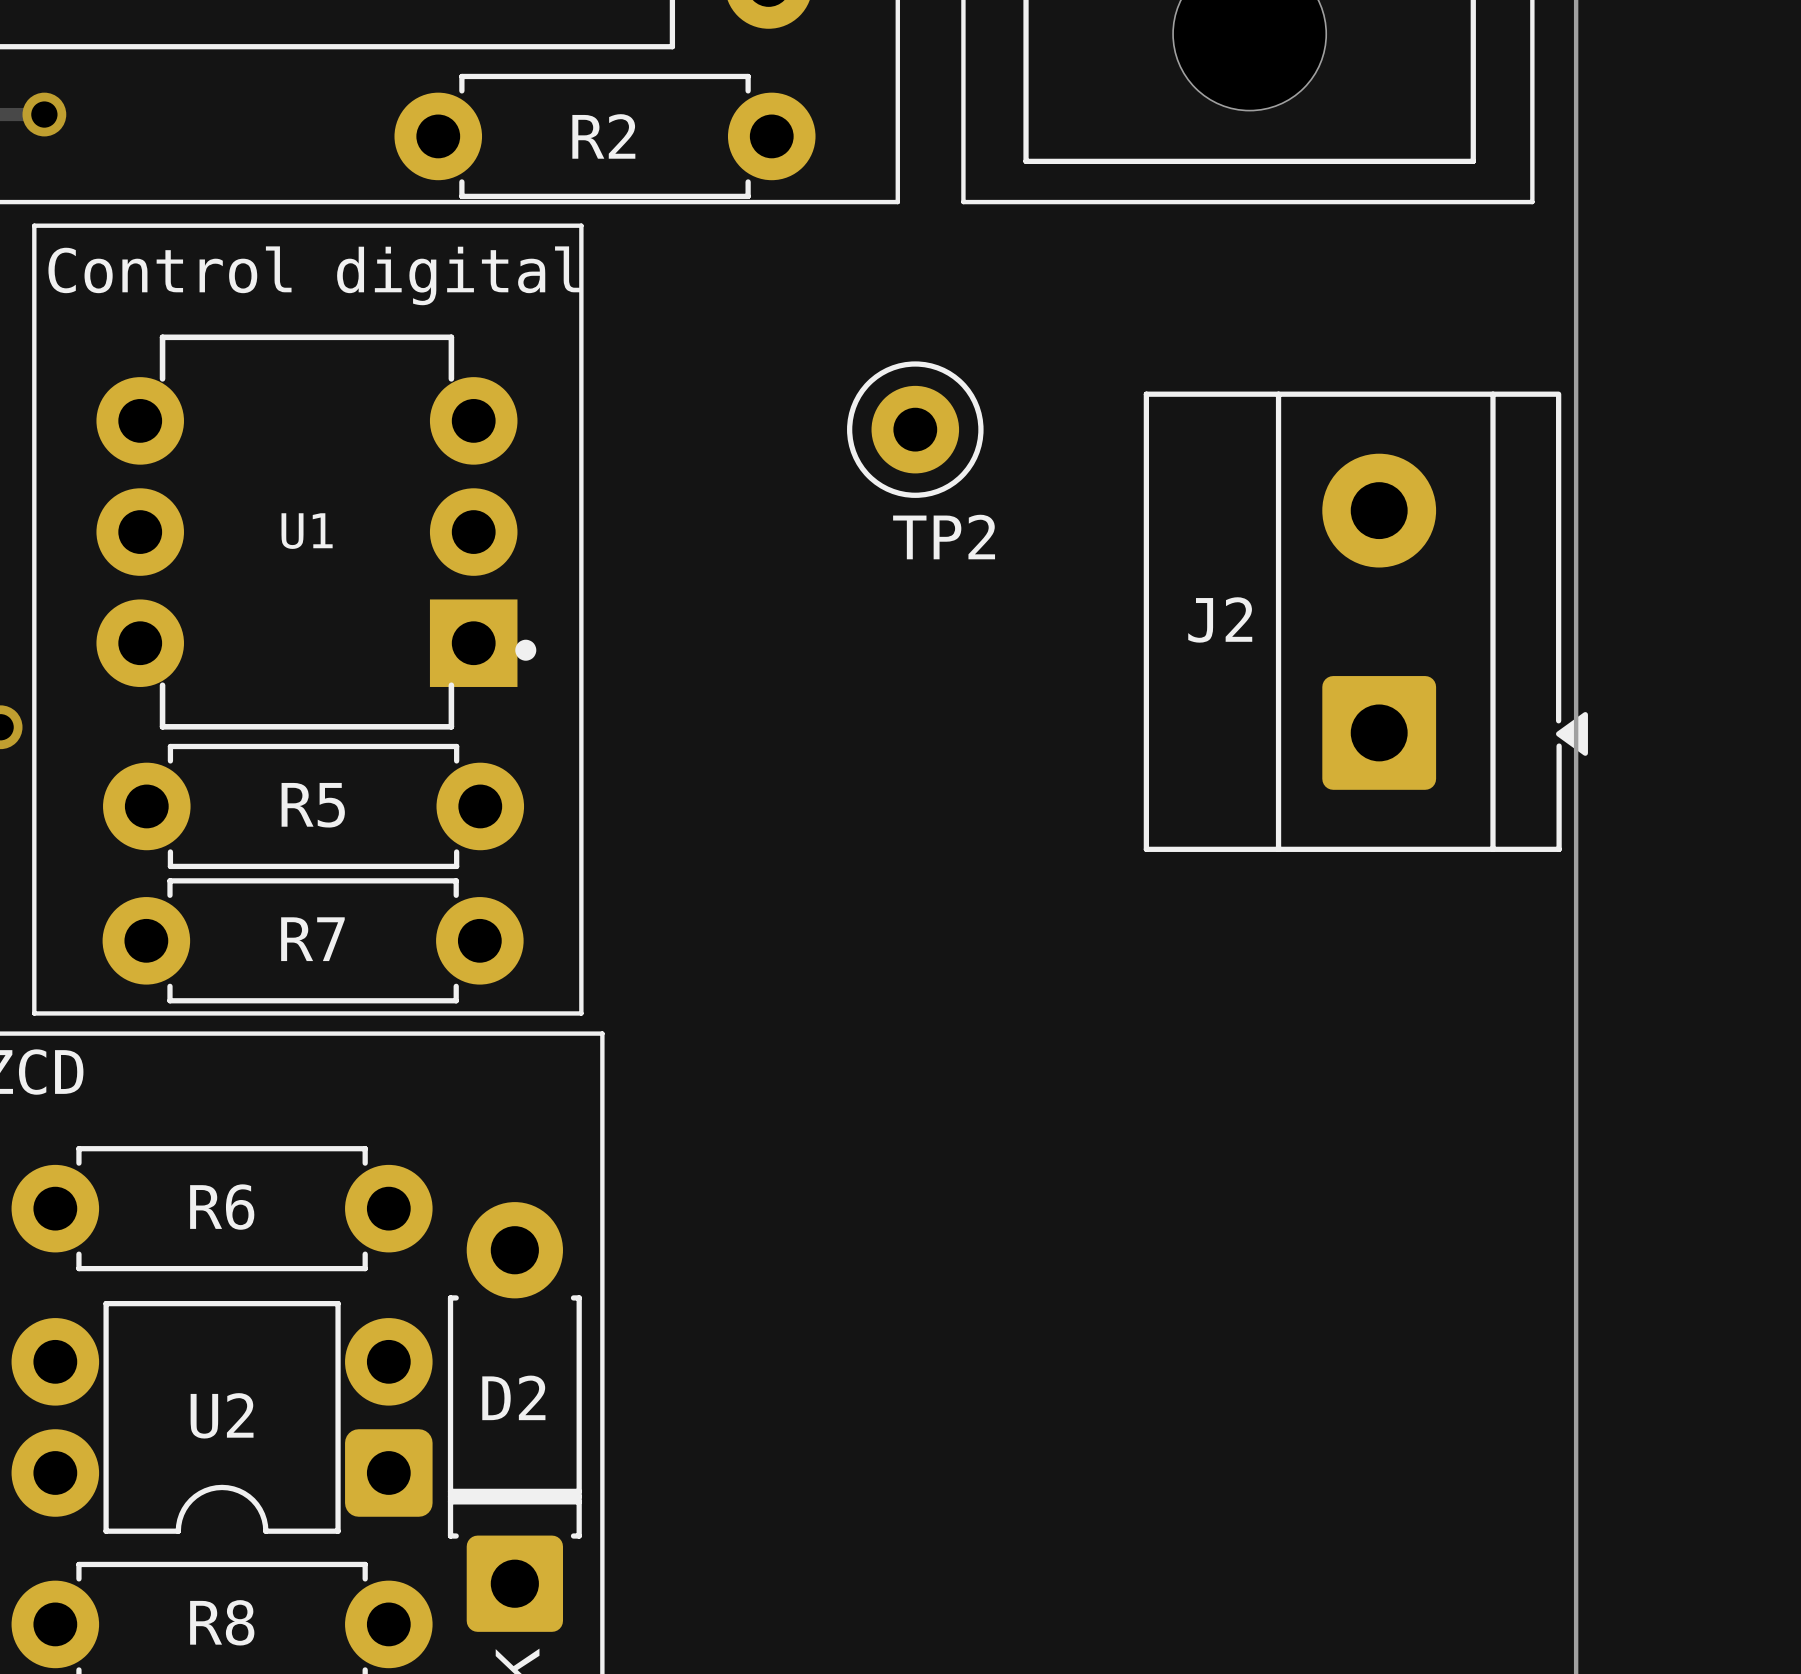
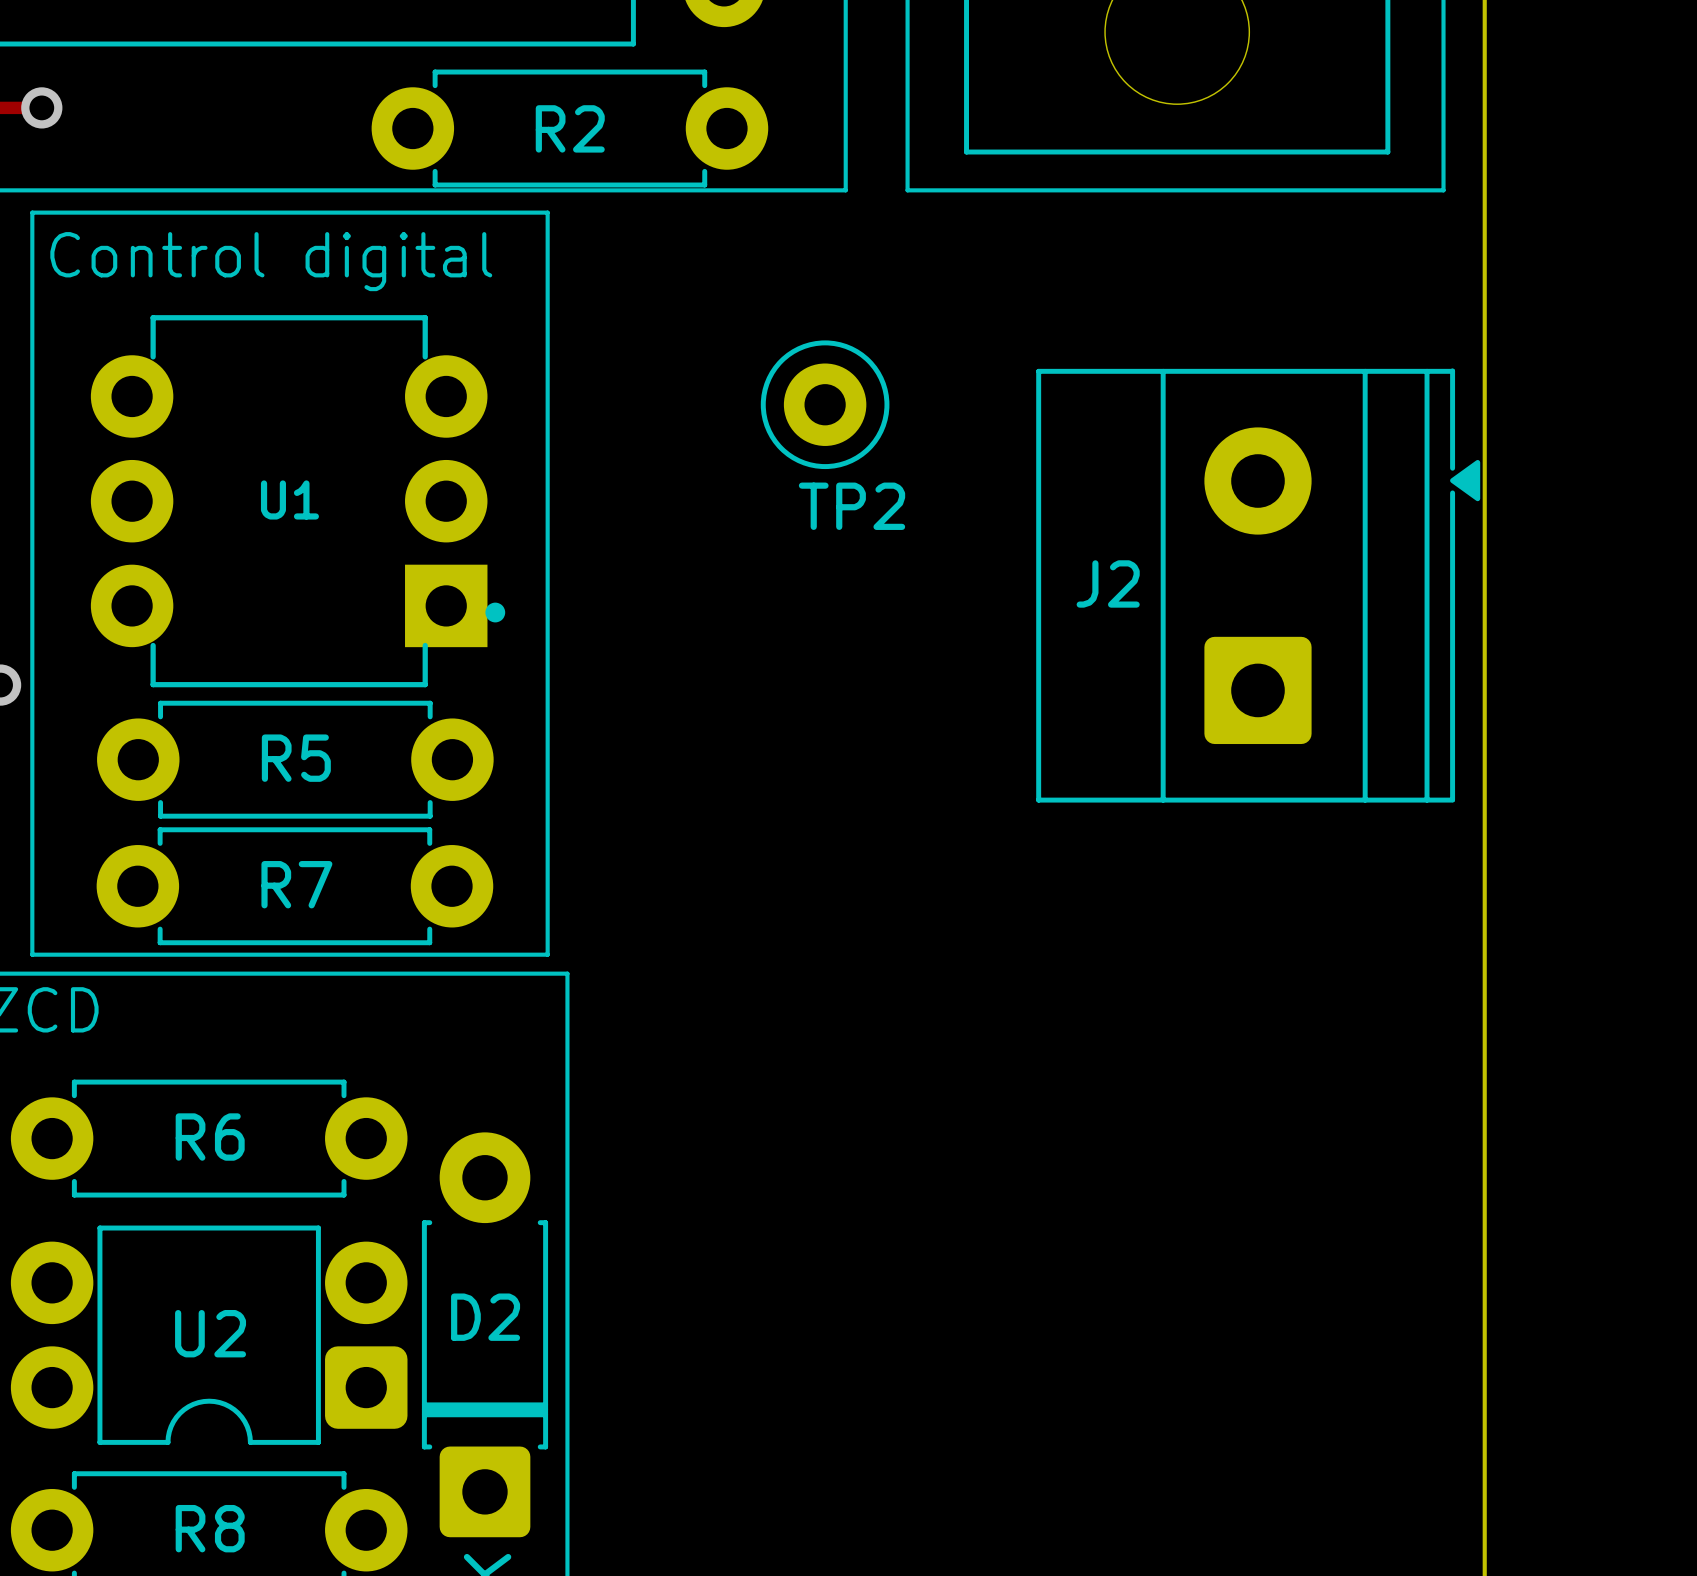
J2 footprint: [1143, 391, 1588, 852] -> [1036, 368, 1481, 803]
TP2 position: (915, 429) -> (825, 404)
J2 name position: J2 (1220, 619) -> J2 (1108, 583)

